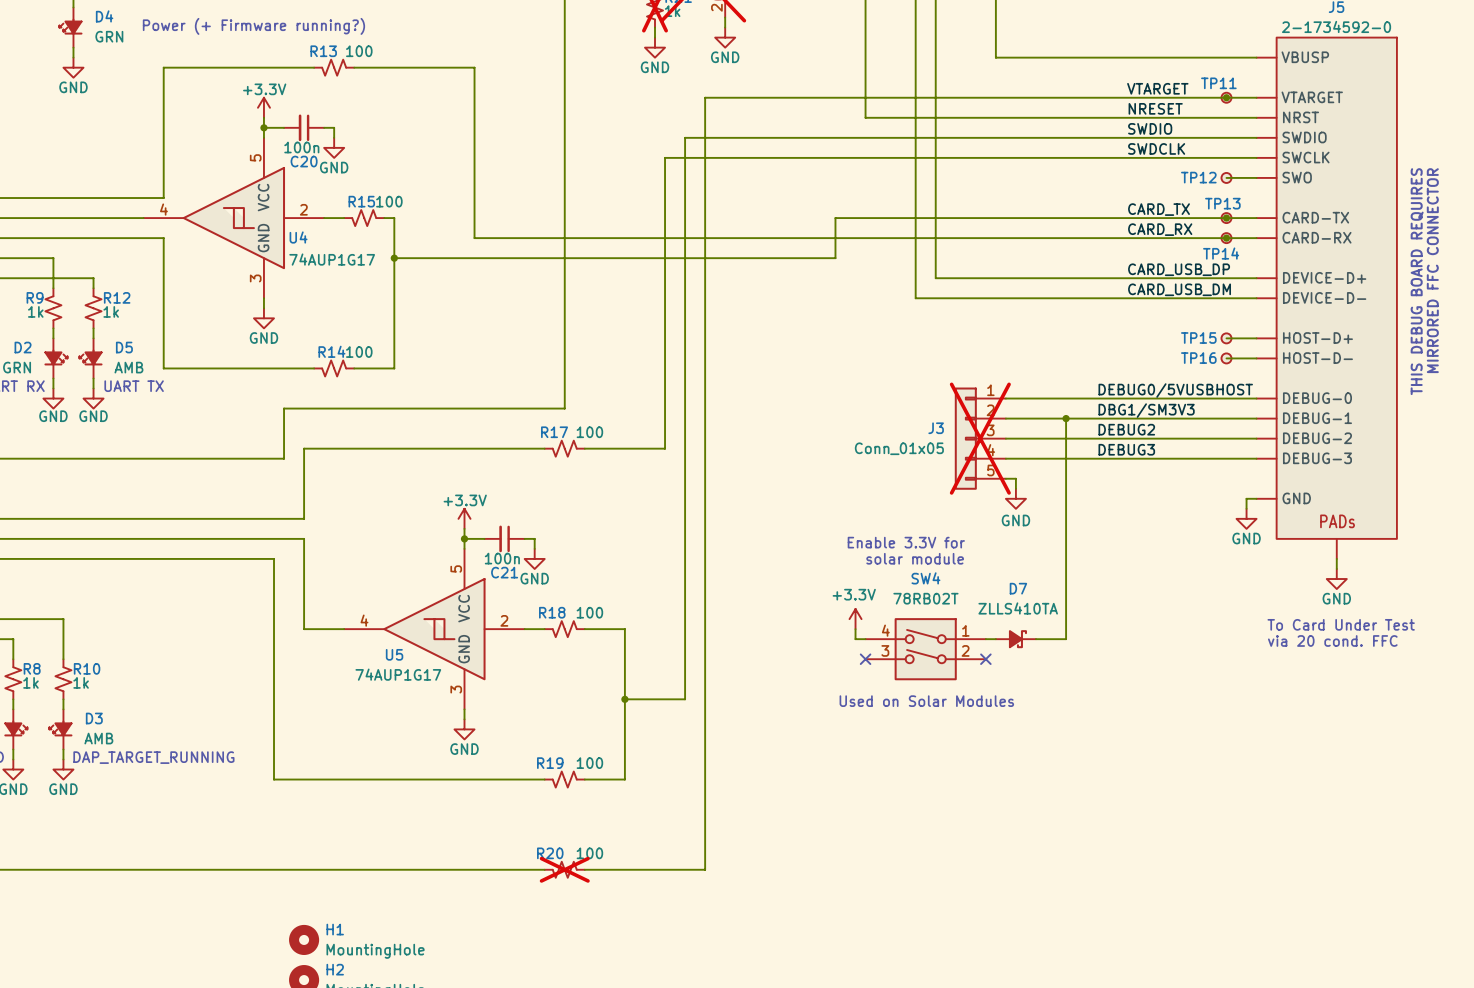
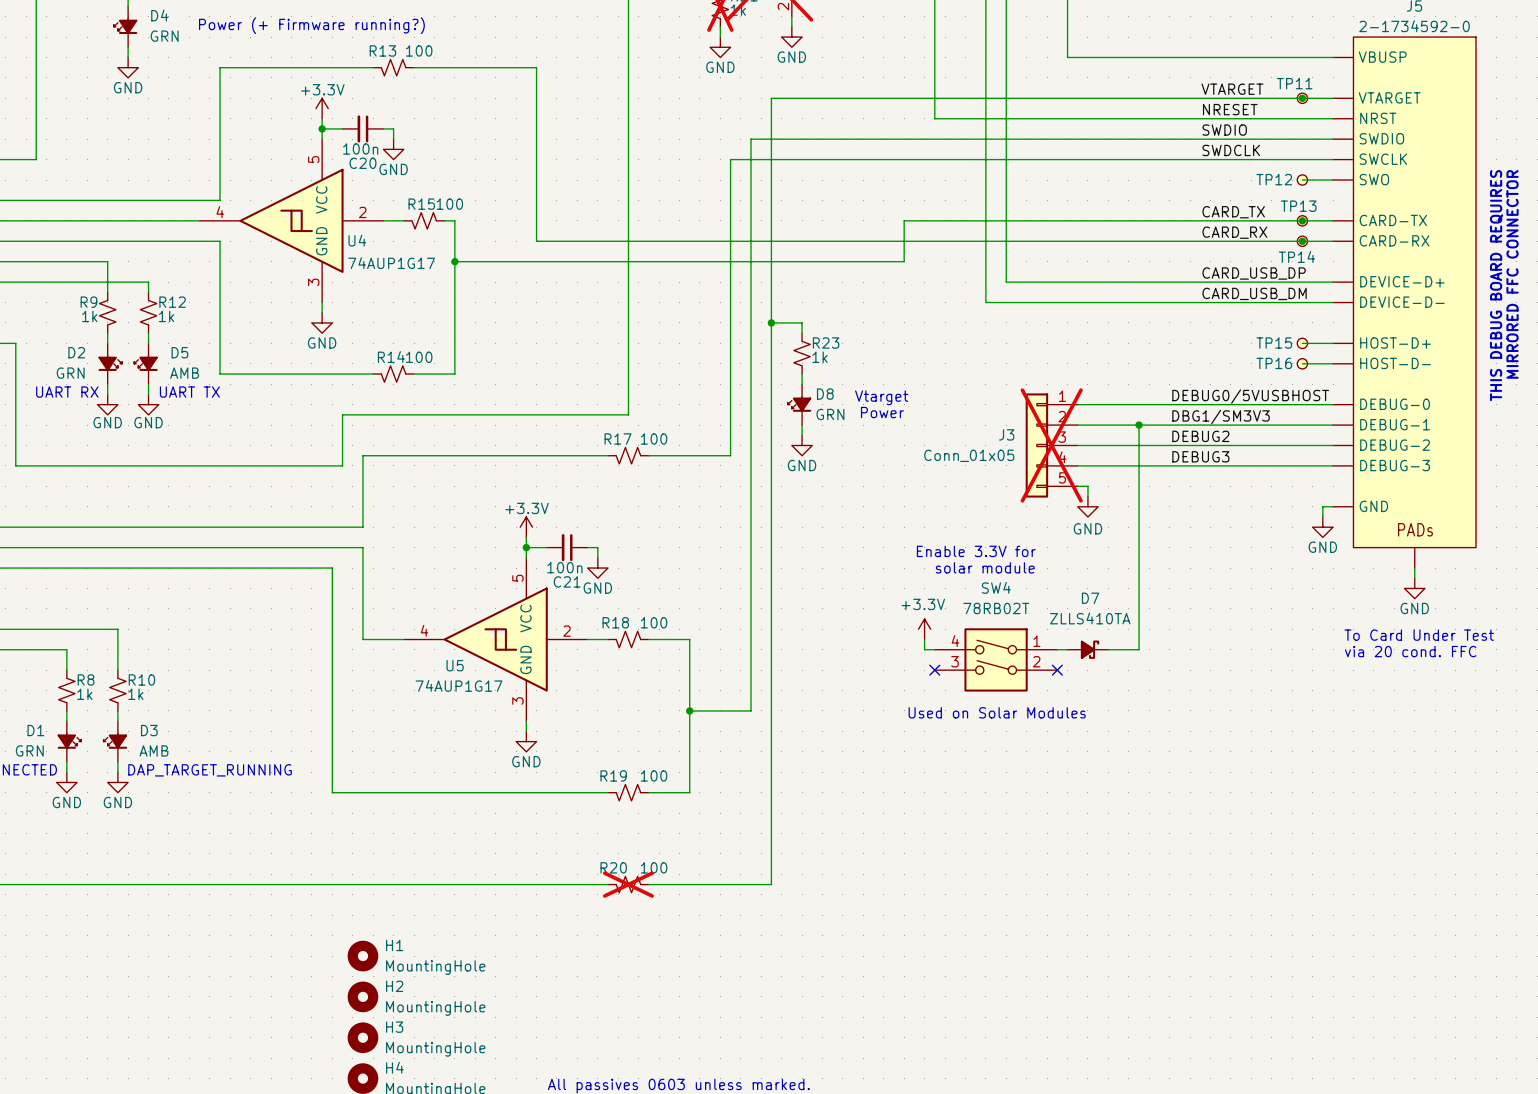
wire: none -> (771, 322) (802, 322) (802, 333)
junction: none -> (771, 322)
R23: none -> 1k (802, 353)
wire: none -> (802, 374) (802, 384)
text: none -> Vtarget (881, 397)
D8: none -> GRN (799, 404)
text: none -> Power (882, 412)
wire: none -> (802, 425) (802, 435)
power symbol: none -> GND (802, 445)

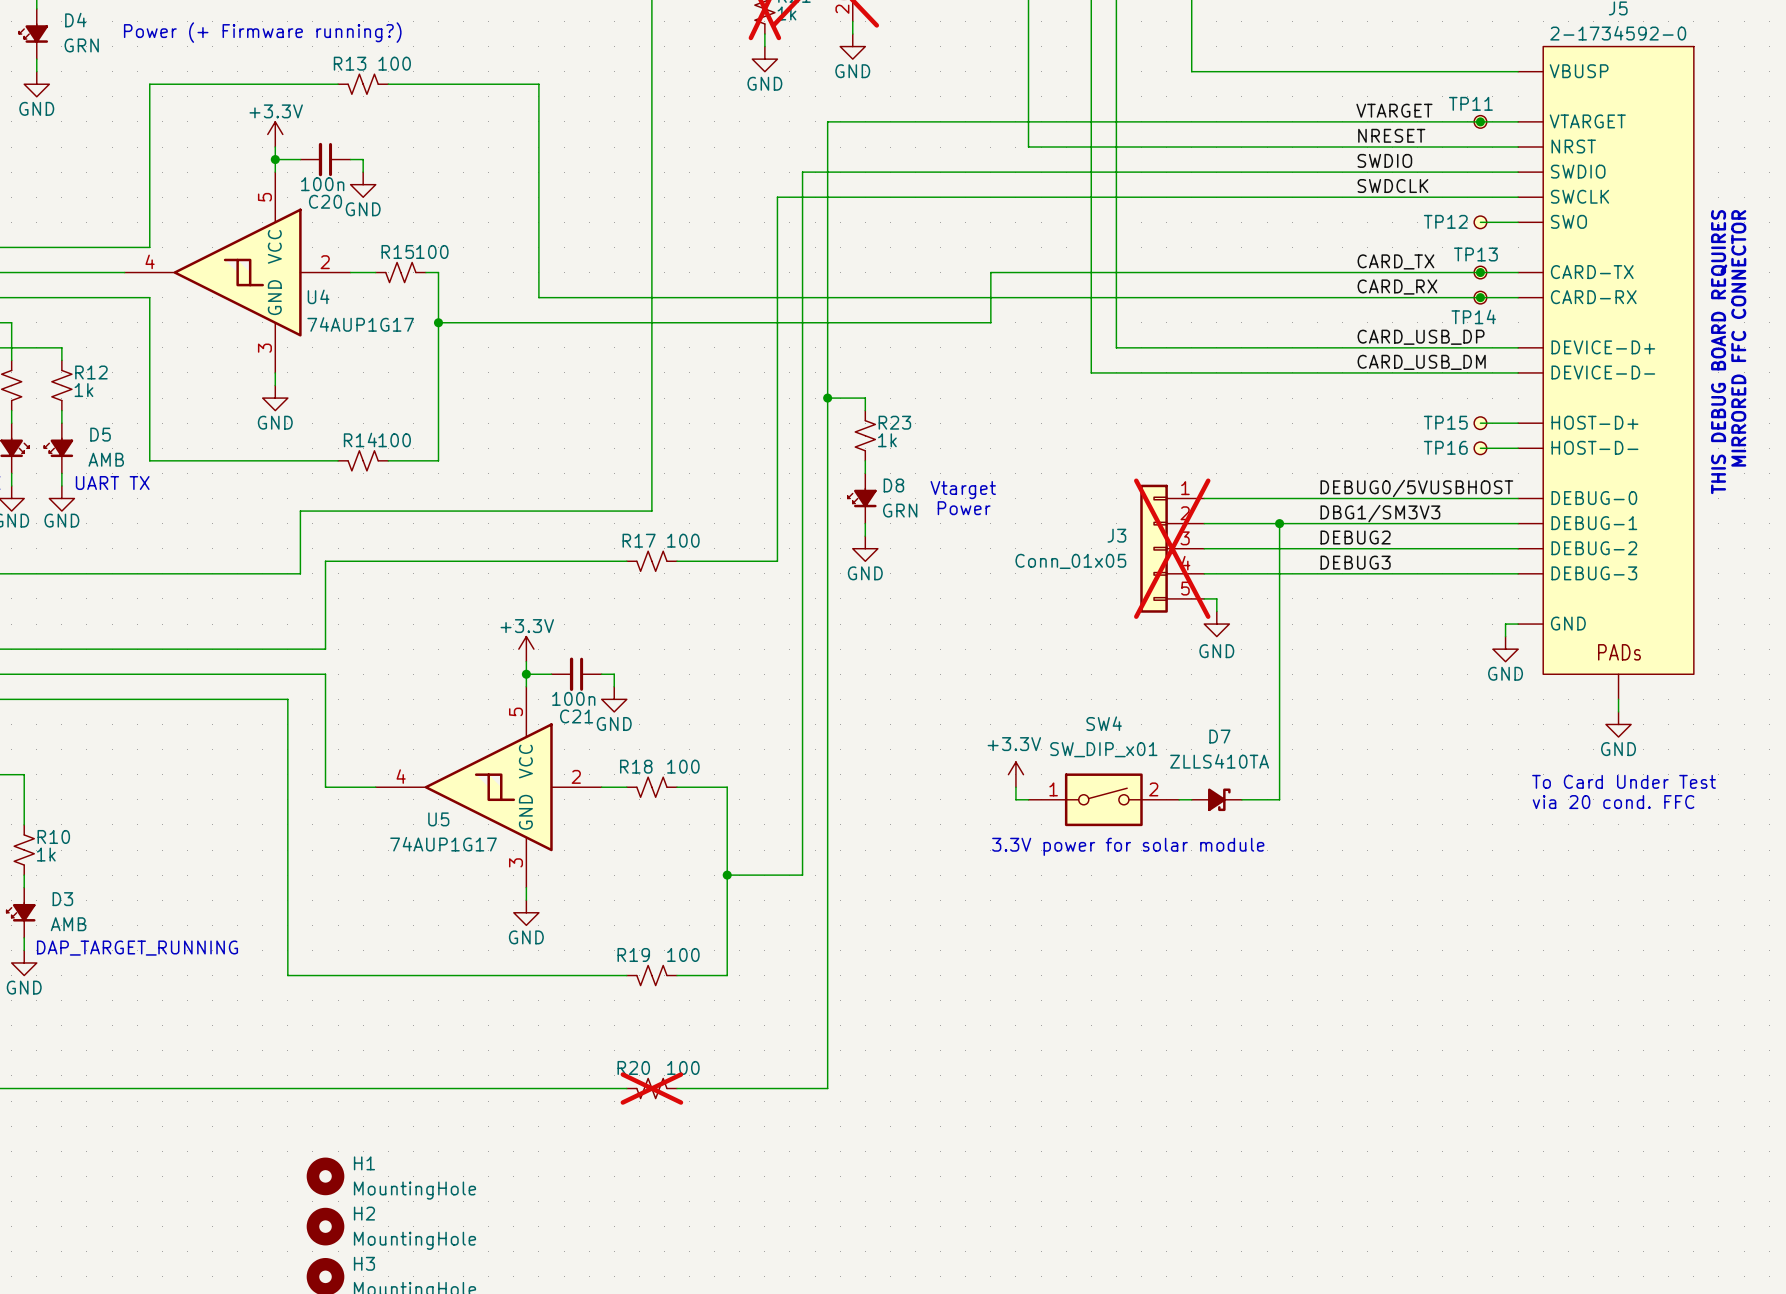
text: Enable 3.3V for (976, 551) -> none
text: solar module (985, 567) -> none
SW4 value: 78RB02T (996, 608) -> SW_DIP_x01 (1103, 749)
SW4 symbol: [934, 628, 1058, 692] -> [1028, 773, 1180, 827]
no-connect mark: (934, 670) -> none
no-connect mark: (1057, 670) -> none
text: none -> 3.3V power for solar module (1128, 846)
text: Used on Solar Modules (997, 712) -> none

